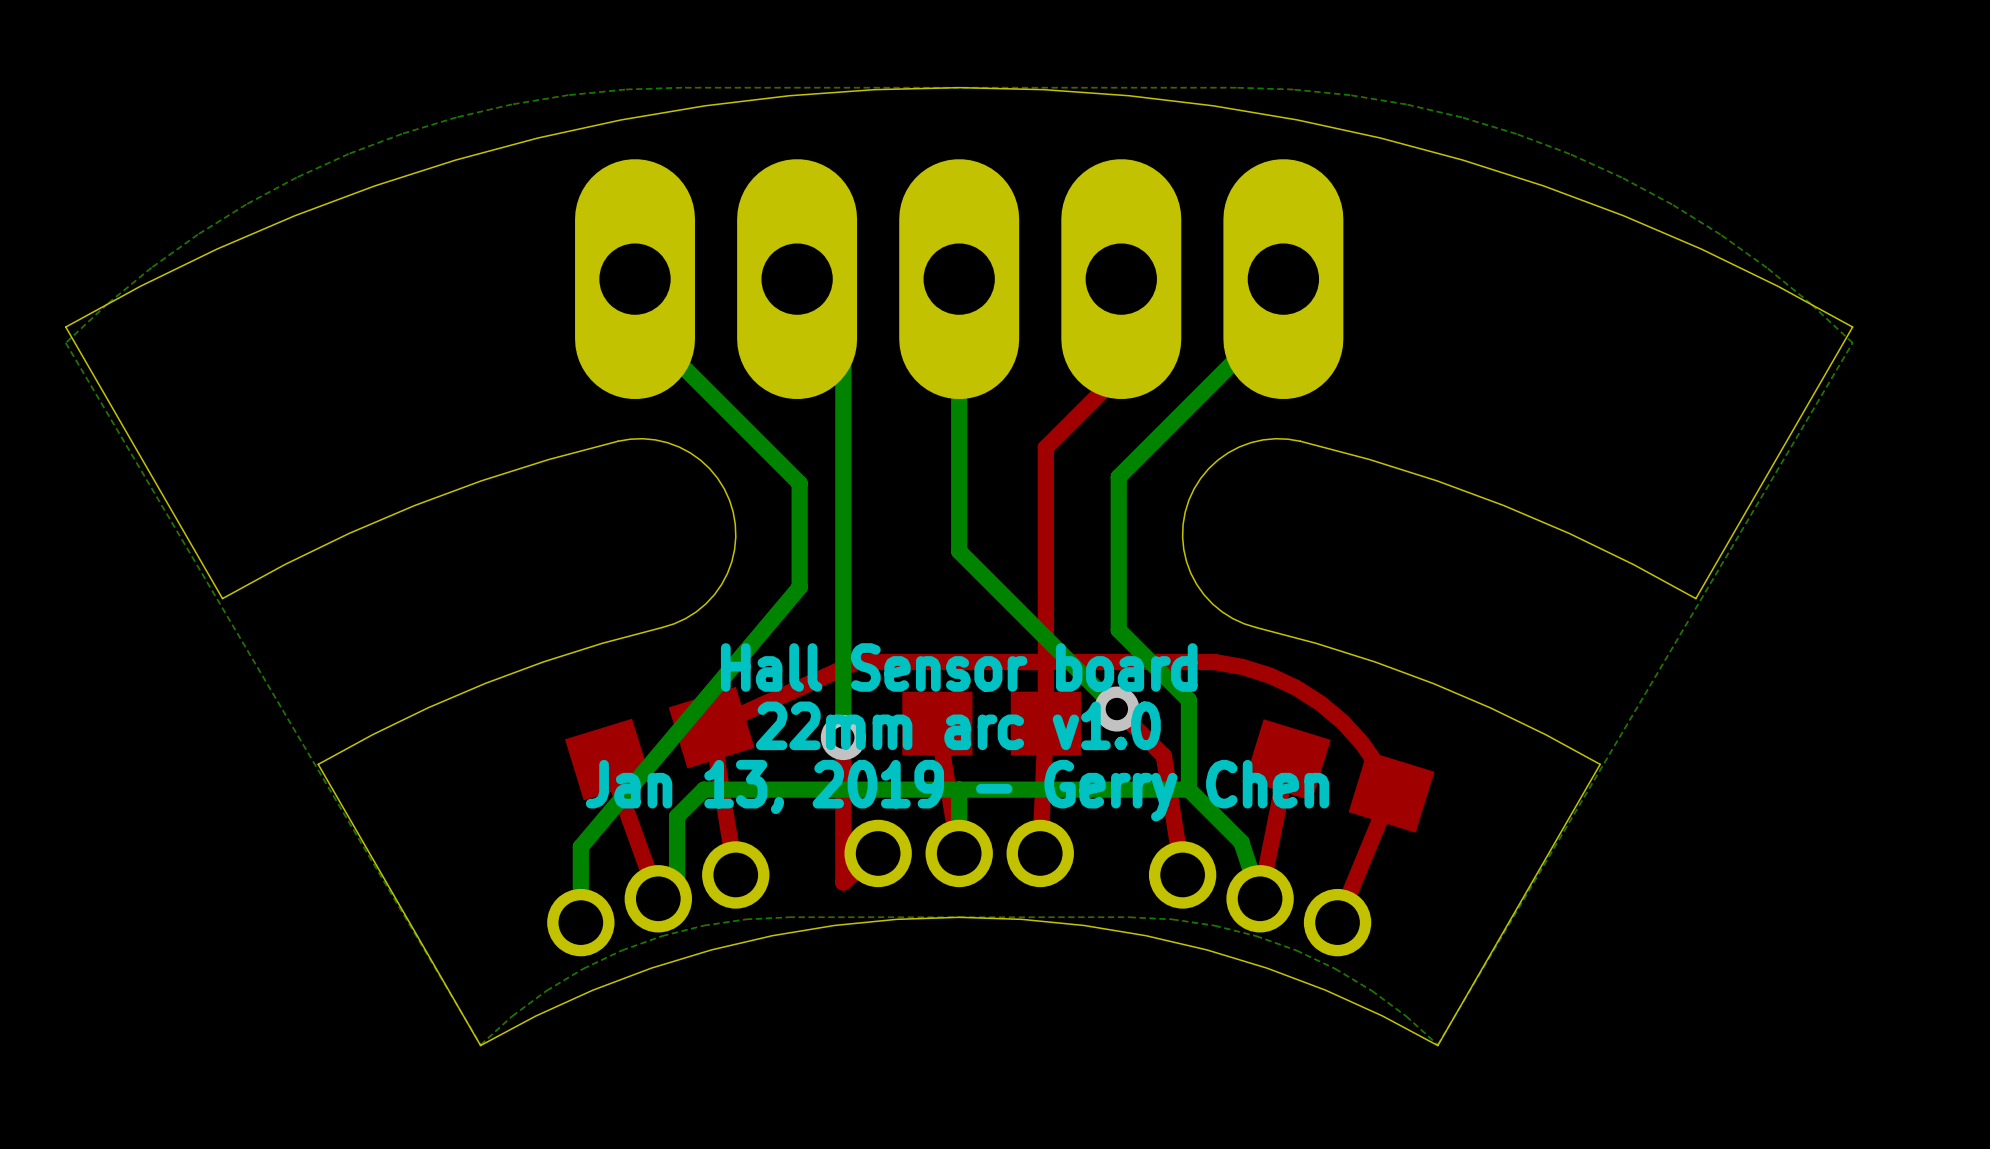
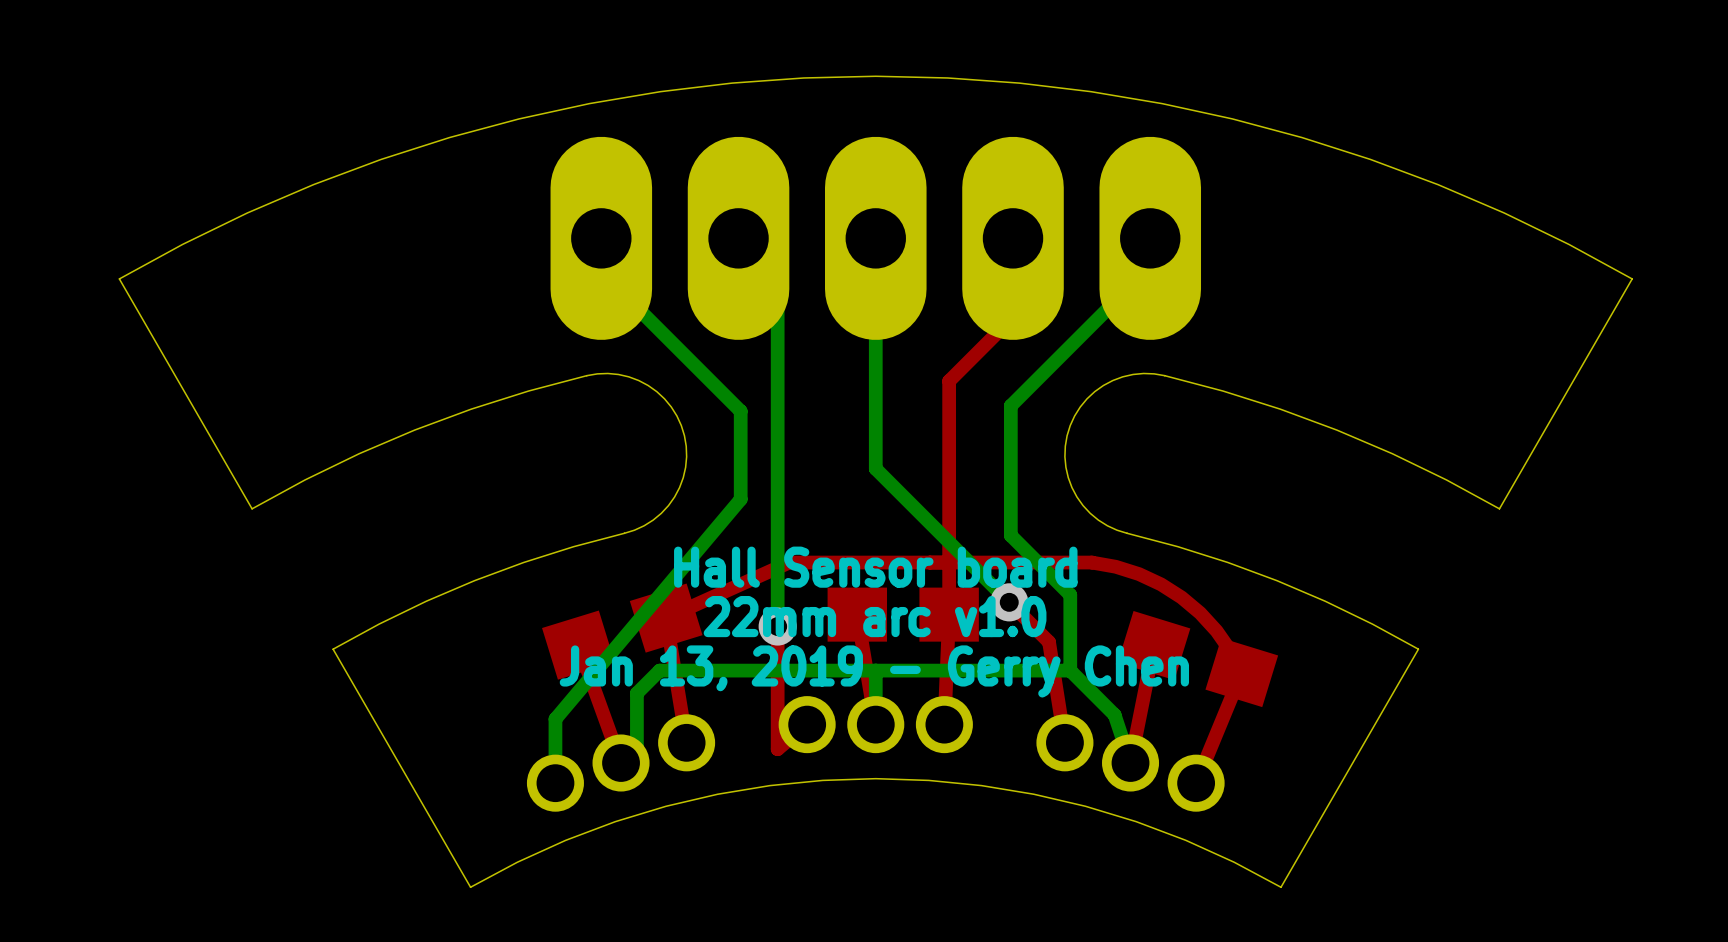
bottom zone outline: (1236, 87) (1293, 89) (1350, 95) (1406, 104) (1461, 117) (1516, 133) (1569, 154) (1621, 177) (1672, 204) (1720, 234) (1766, 267) (1810, 303) (1852, 342) (1437, 1044) (1406, 1016) (1371, 990) (1335, 968) (1296, 950) (1256, 936) (1214, 925) (1172, 919) (1129, 917) (788, 917) (745, 919) (703, 925) (662, 936) (621, 950) (583, 968) (546, 990) (512, 1016) (480, 1044) (65, 342) (107, 303) (151, 267) (197, 234) (246, 204) (296, 177) (348, 154) (401, 133) (456, 117) (512, 104) (568, 95) (625, 89) (682, 87) (1236, 87) -> none

